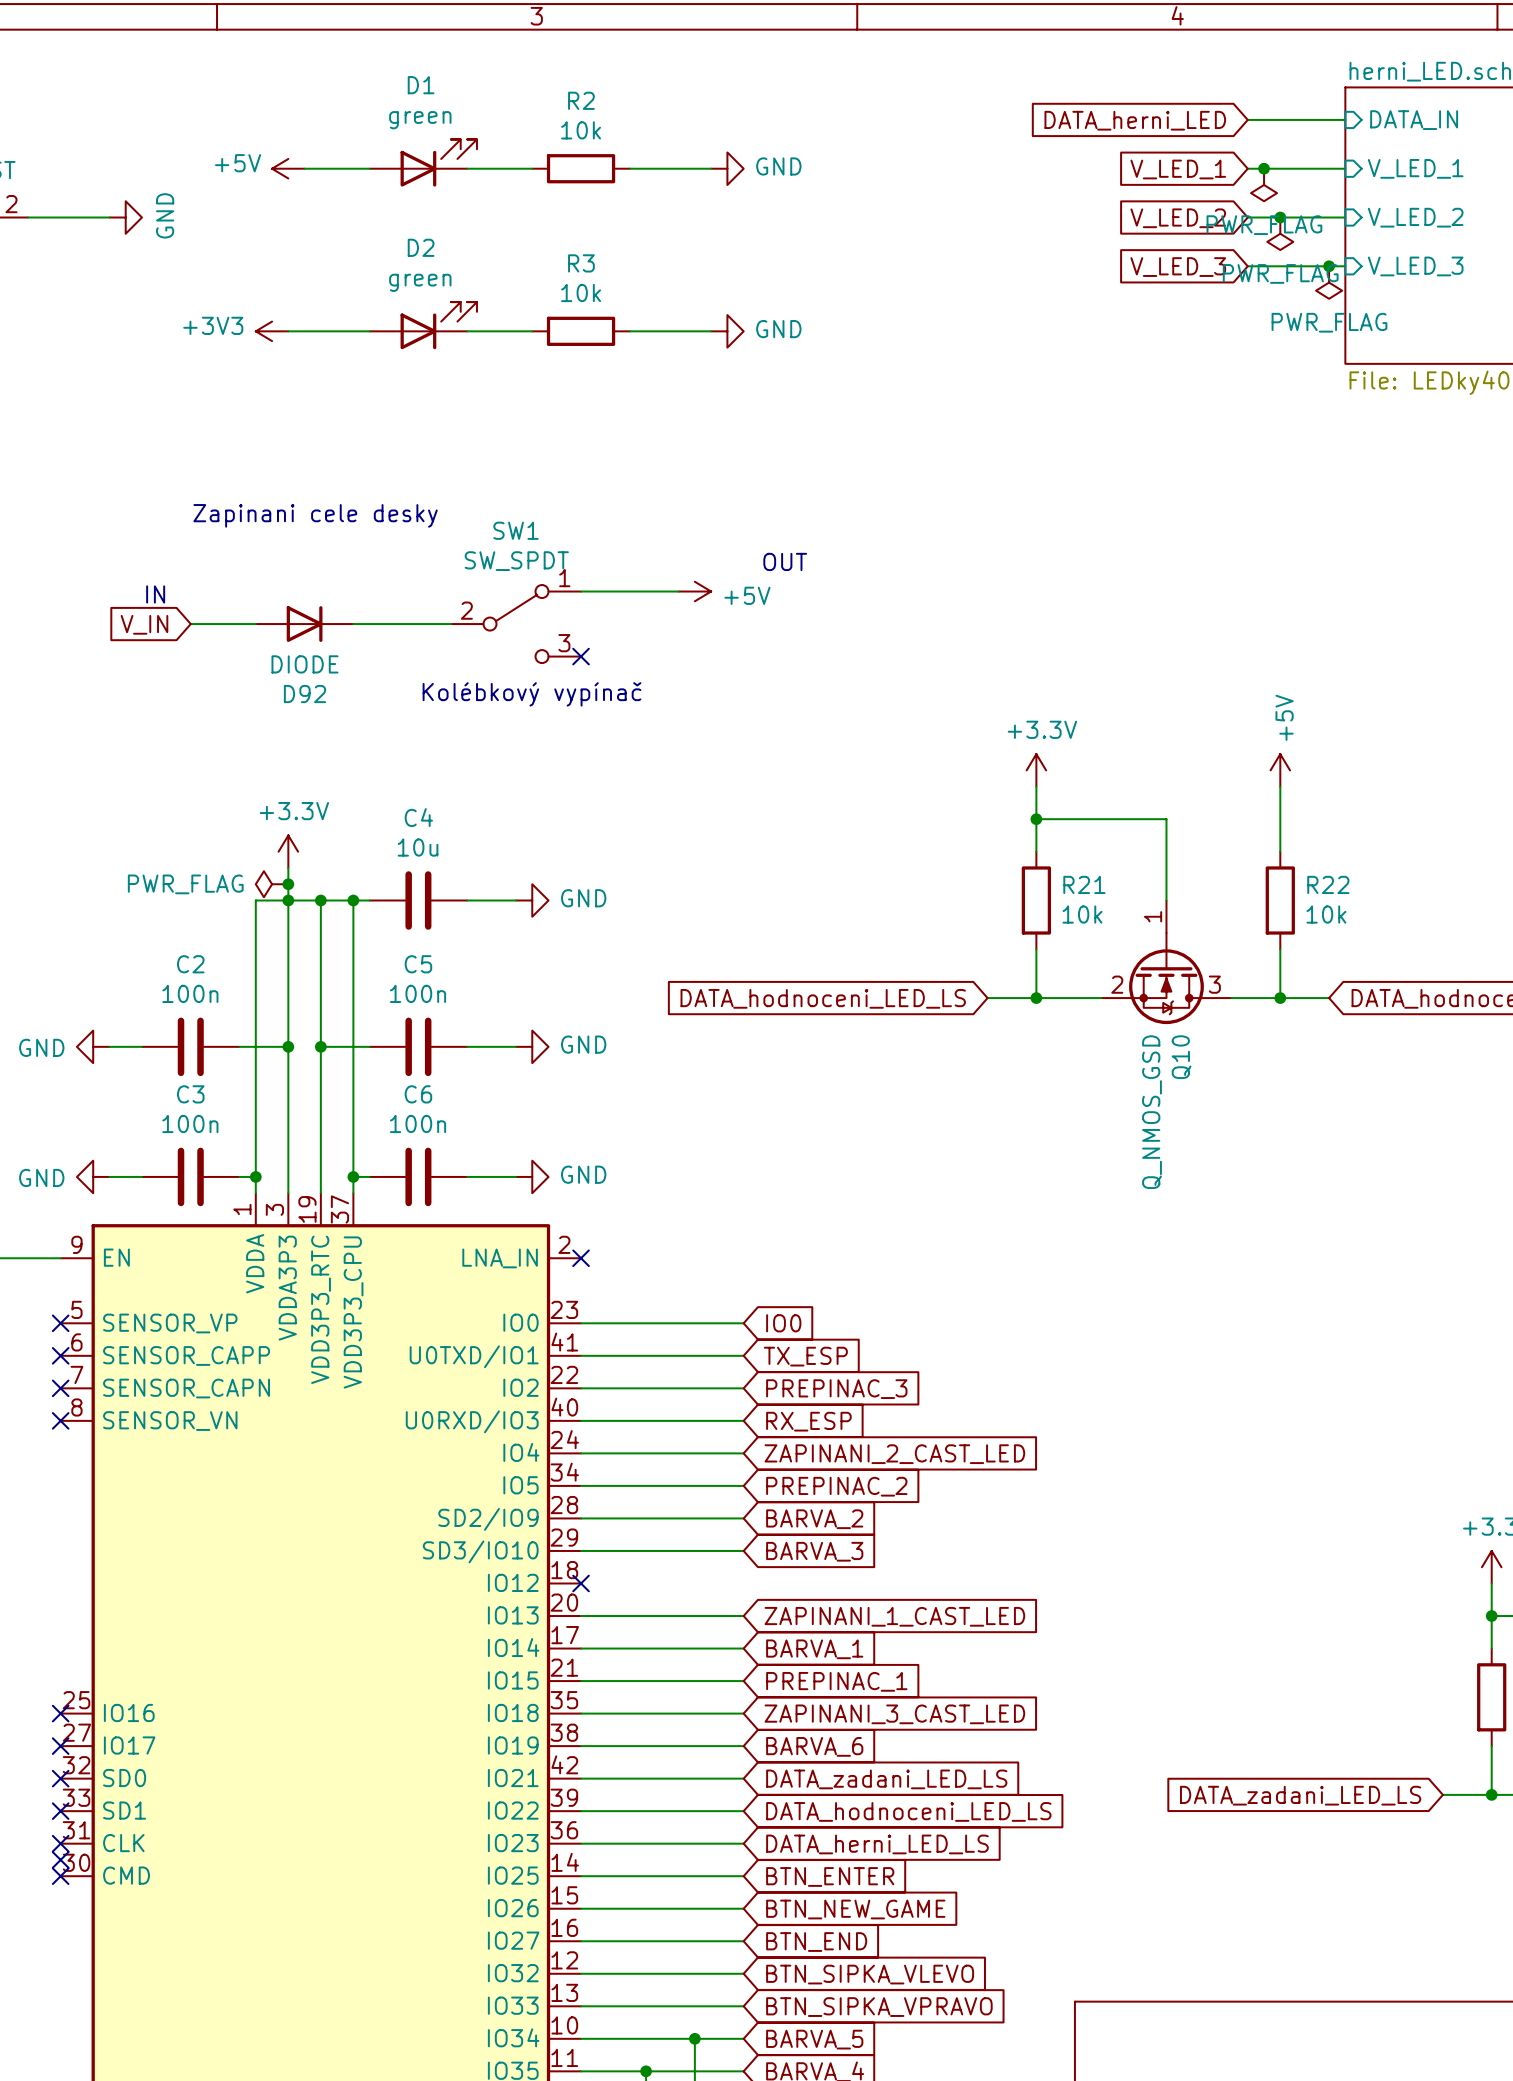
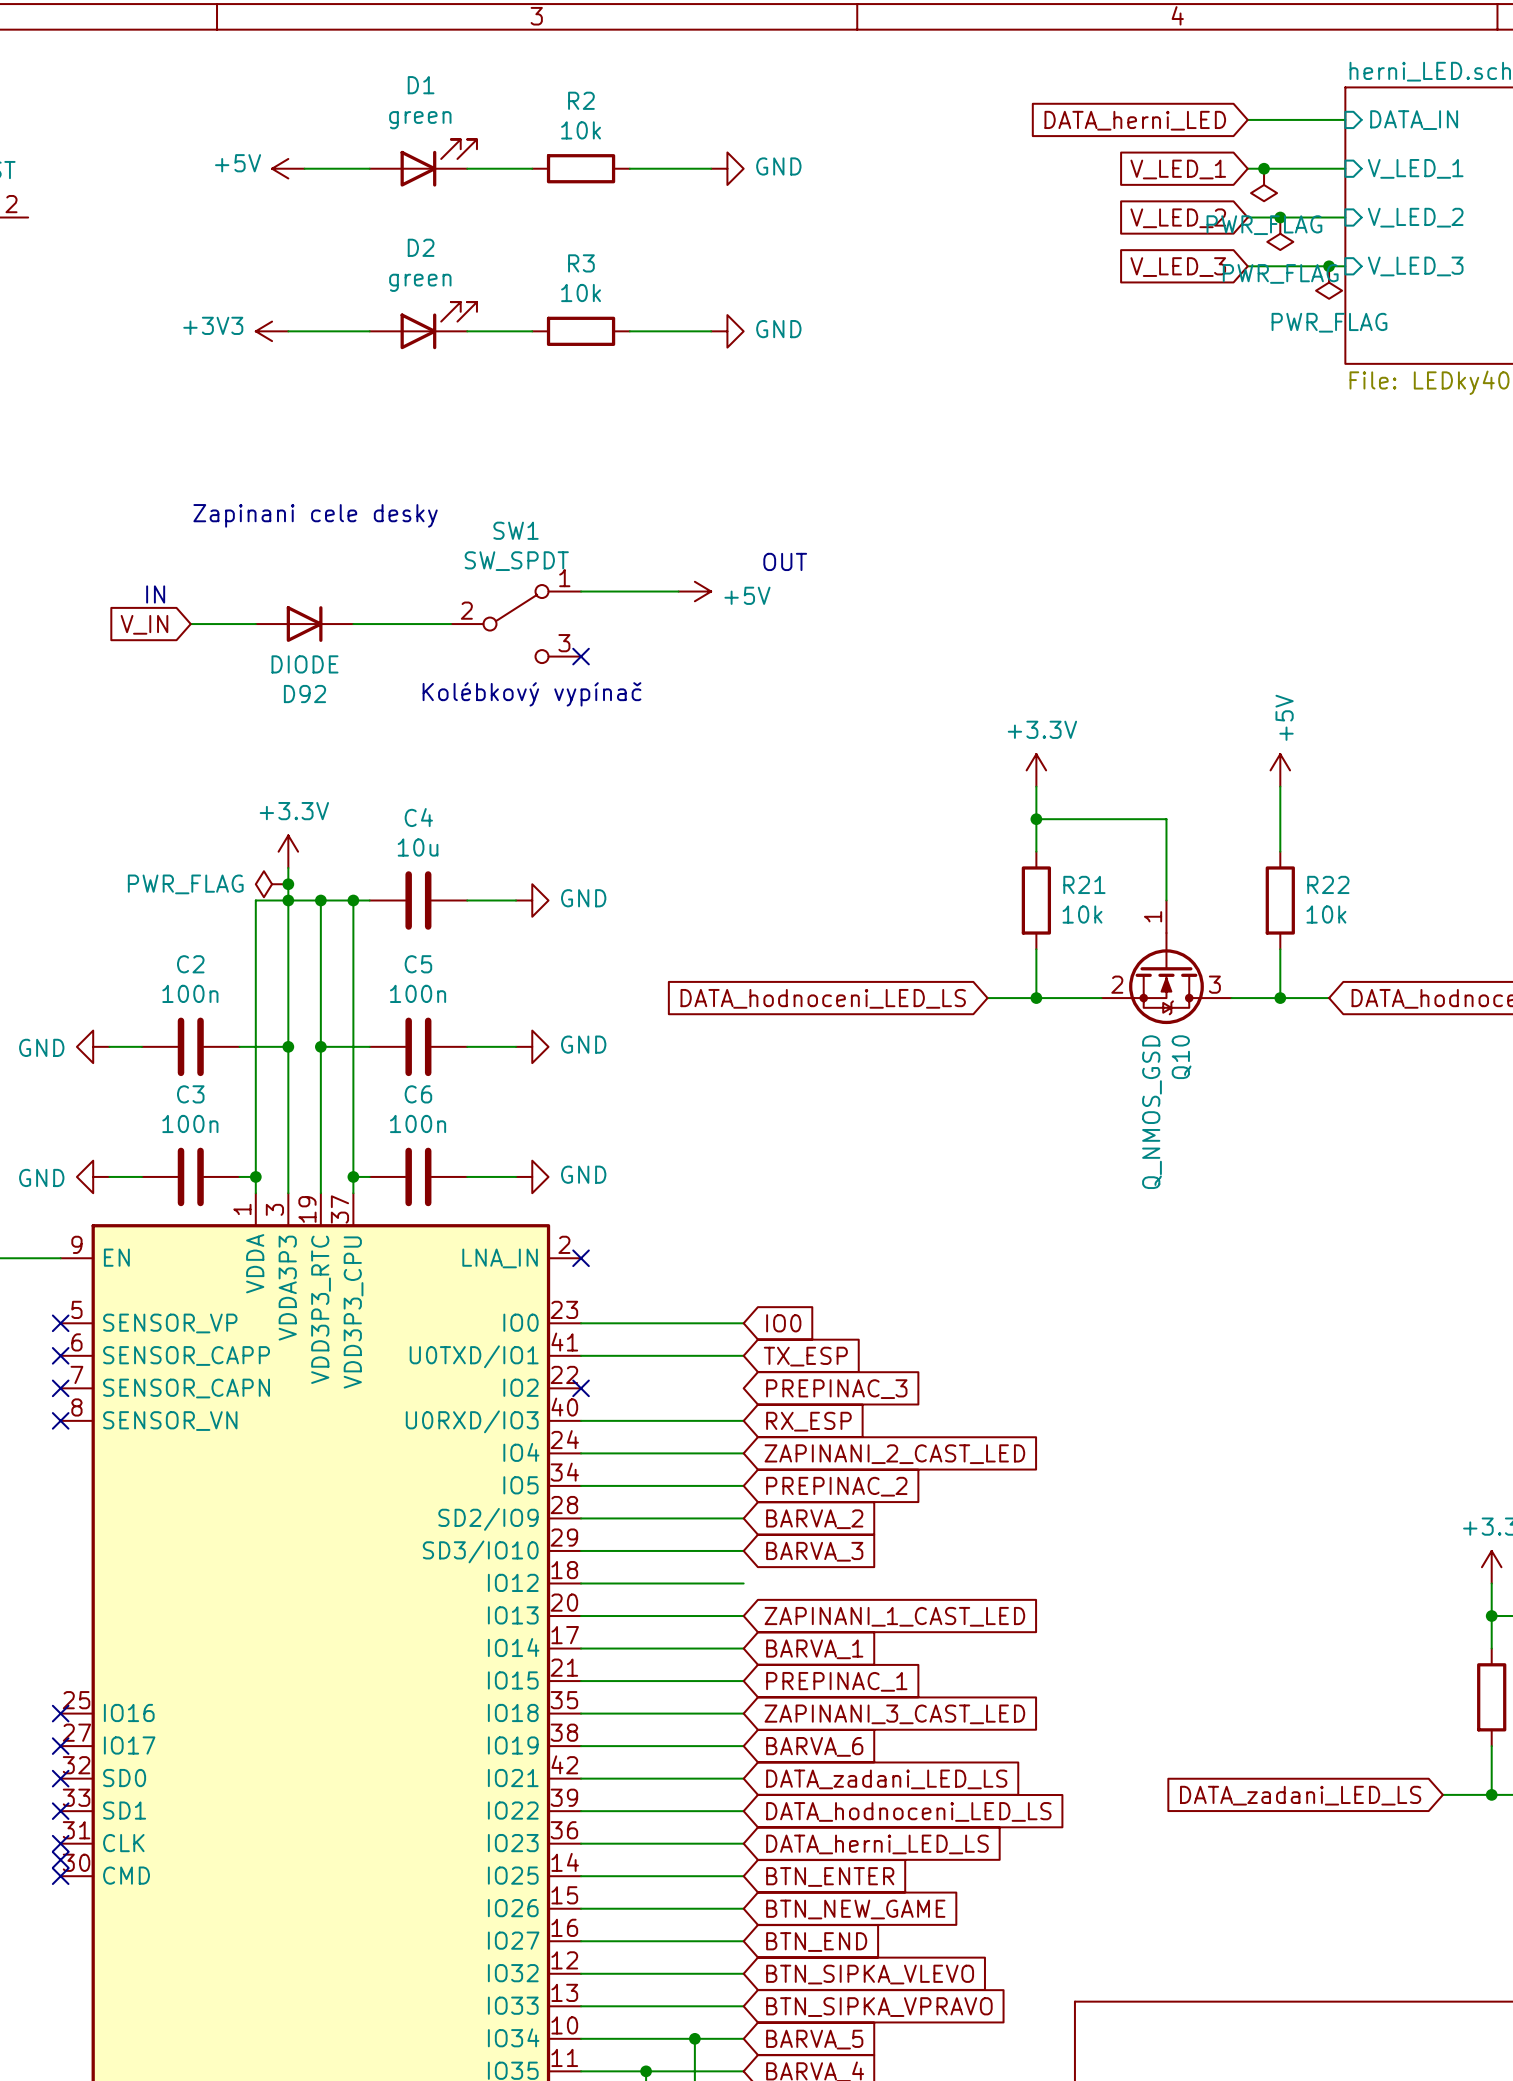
wire: (28, 217) (109, 217) -> none
power symbol: GND (125, 217) -> none
wire: (581, 1388) (743, 1388) -> (581, 1583) (743, 1583)
no-connect mark: none -> (581, 1388)
no-connect mark: (581, 1583) -> none

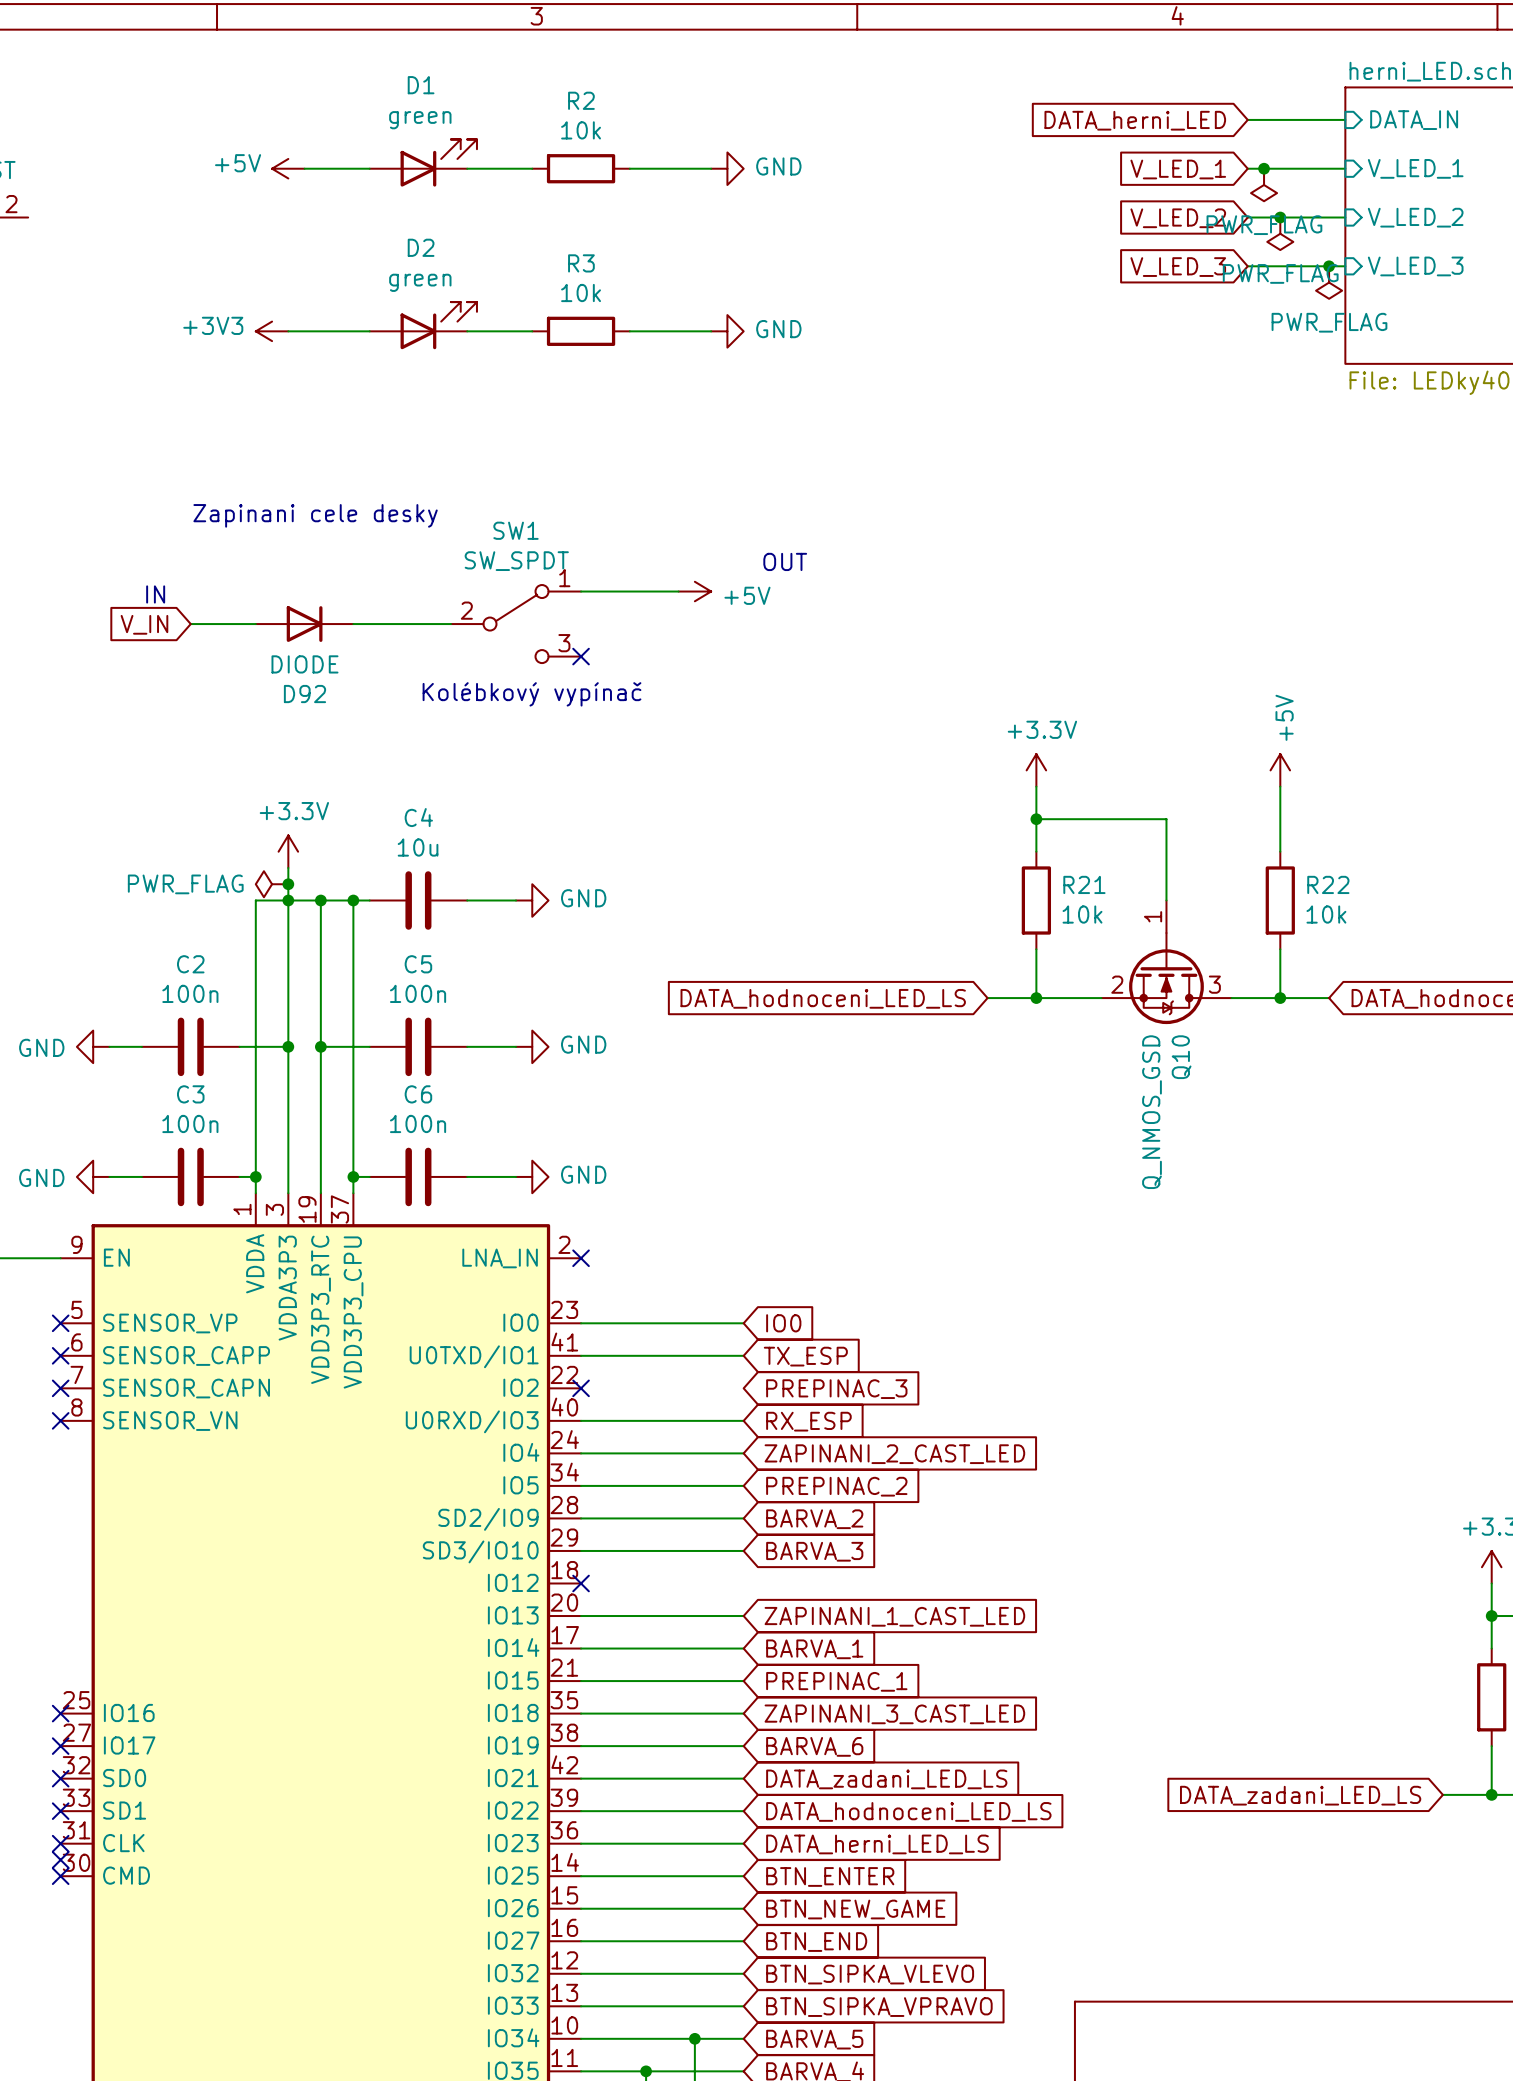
wire: (581, 1583) (743, 1583) -> none
no-connect mark: none -> (581, 1583)

